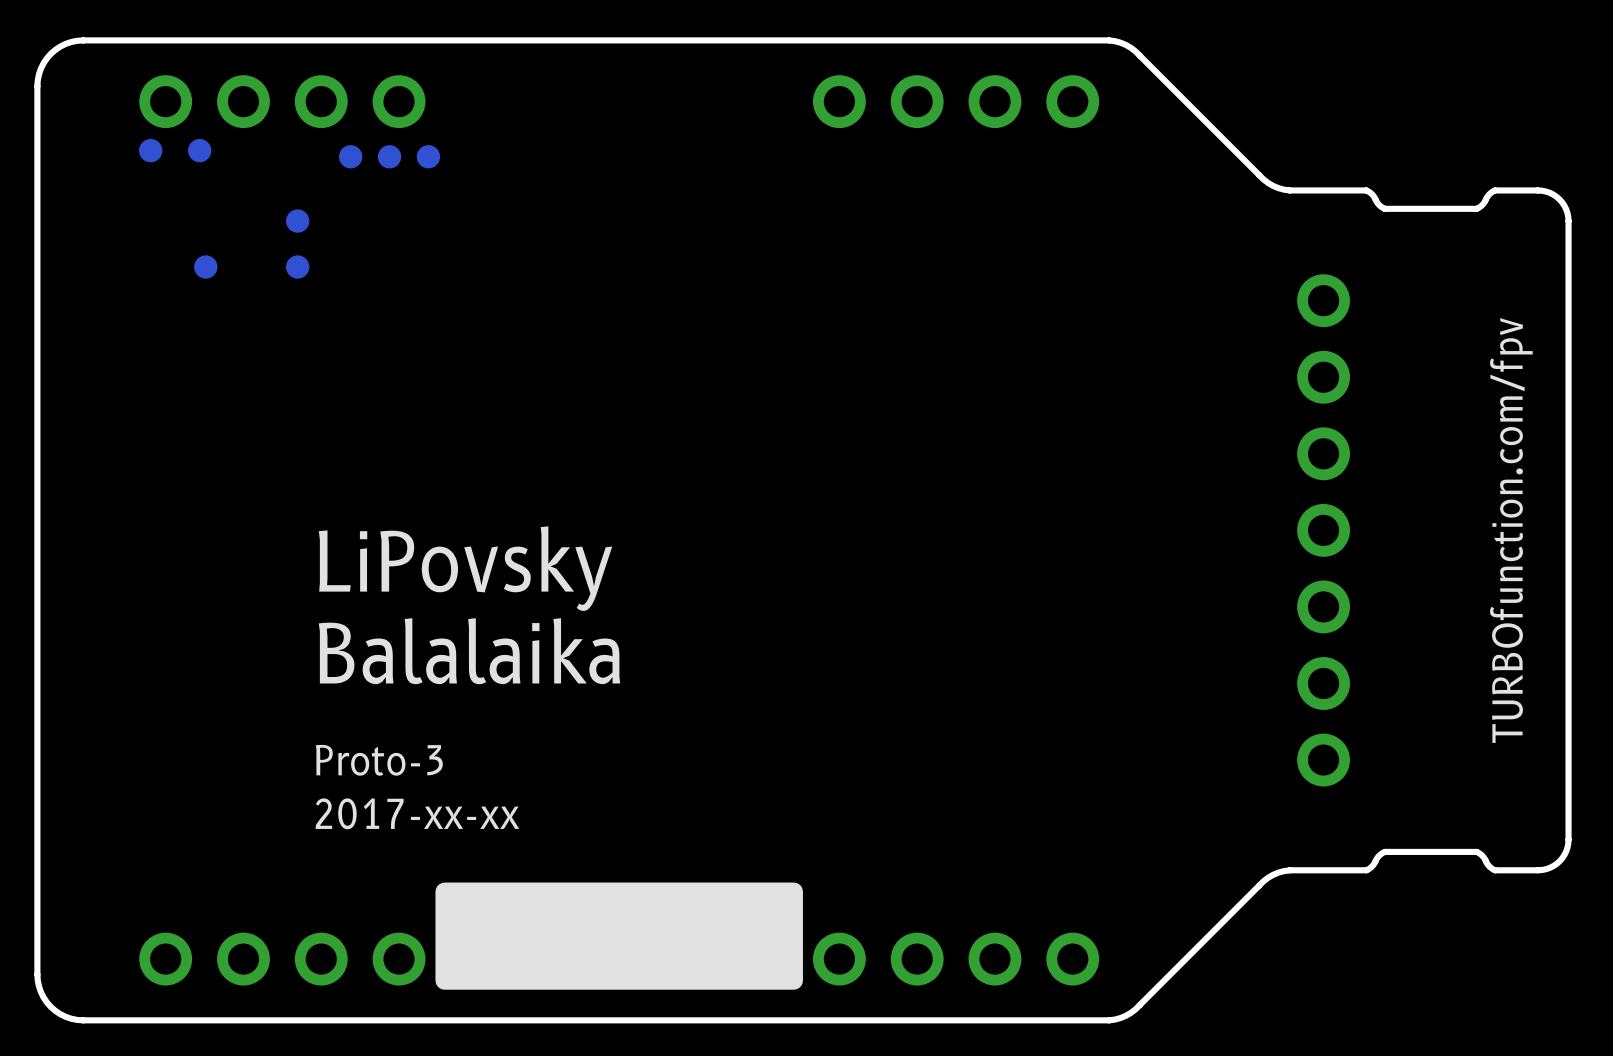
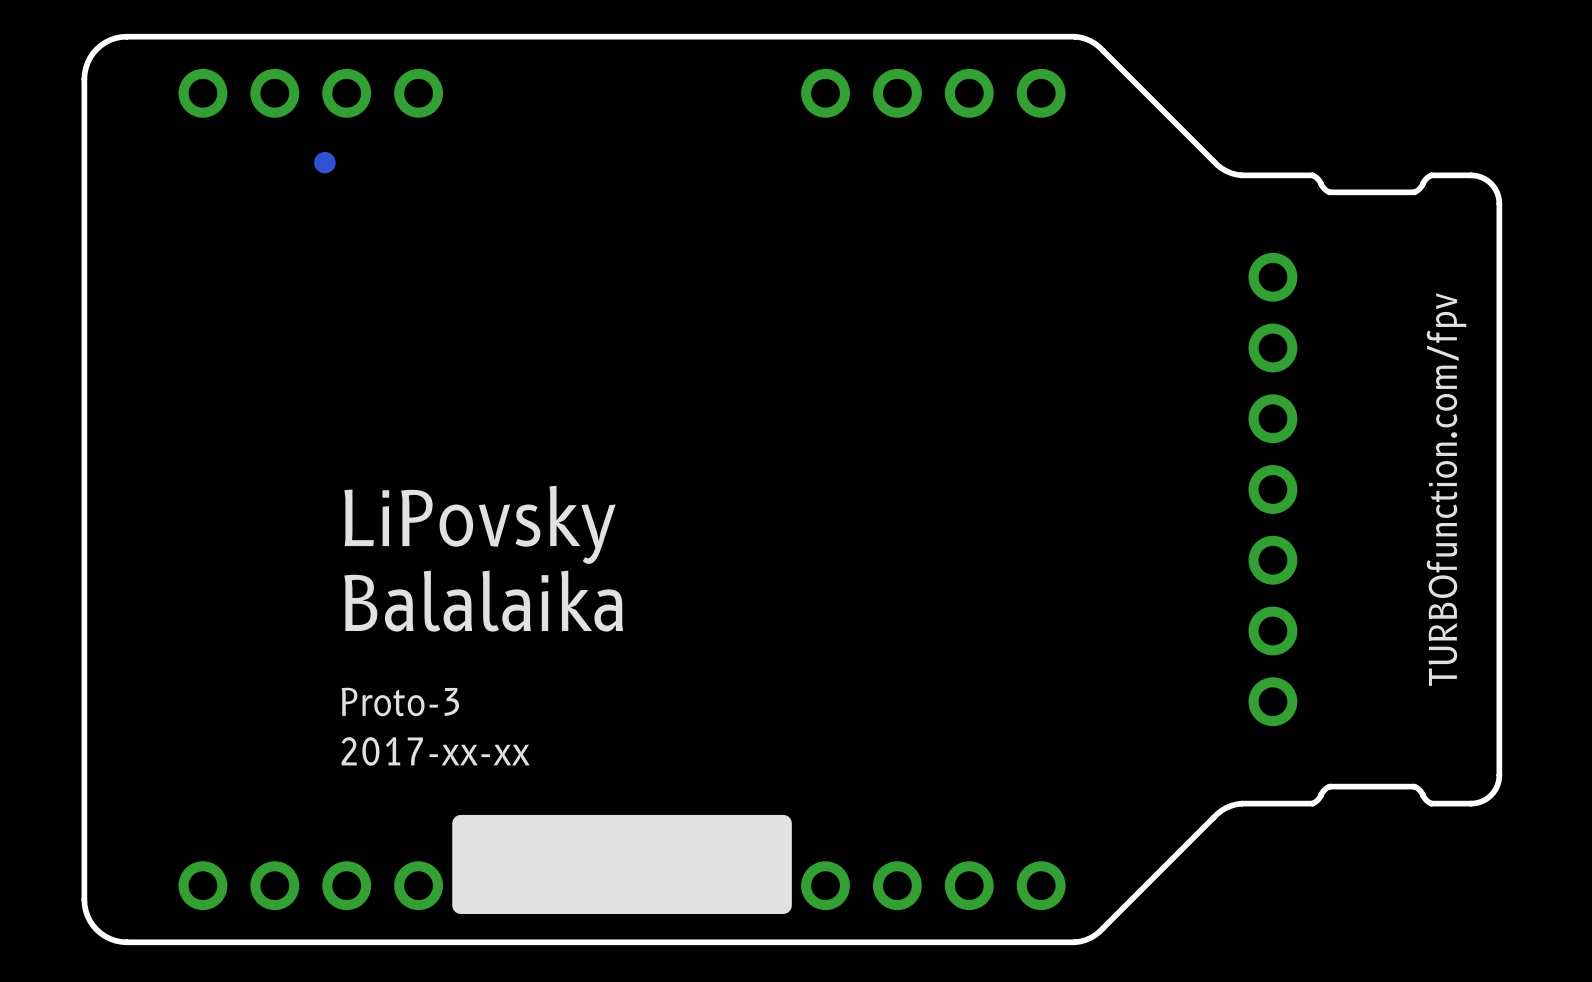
part: (150, 150) -> none
part: (199, 150) -> none
part: (350, 156) -> none
part: (389, 156) -> none
part: (428, 156) -> none
part: none -> (324, 162)
part: (297, 221) -> none
part: (205, 267) -> none
part: (297, 267) -> none

